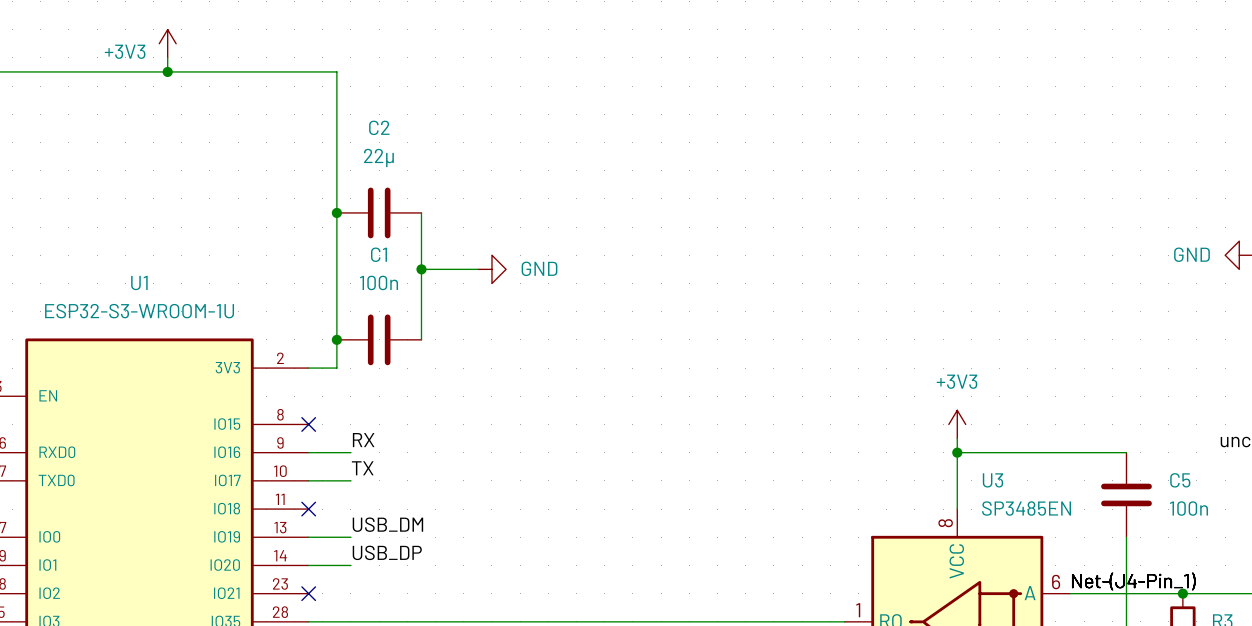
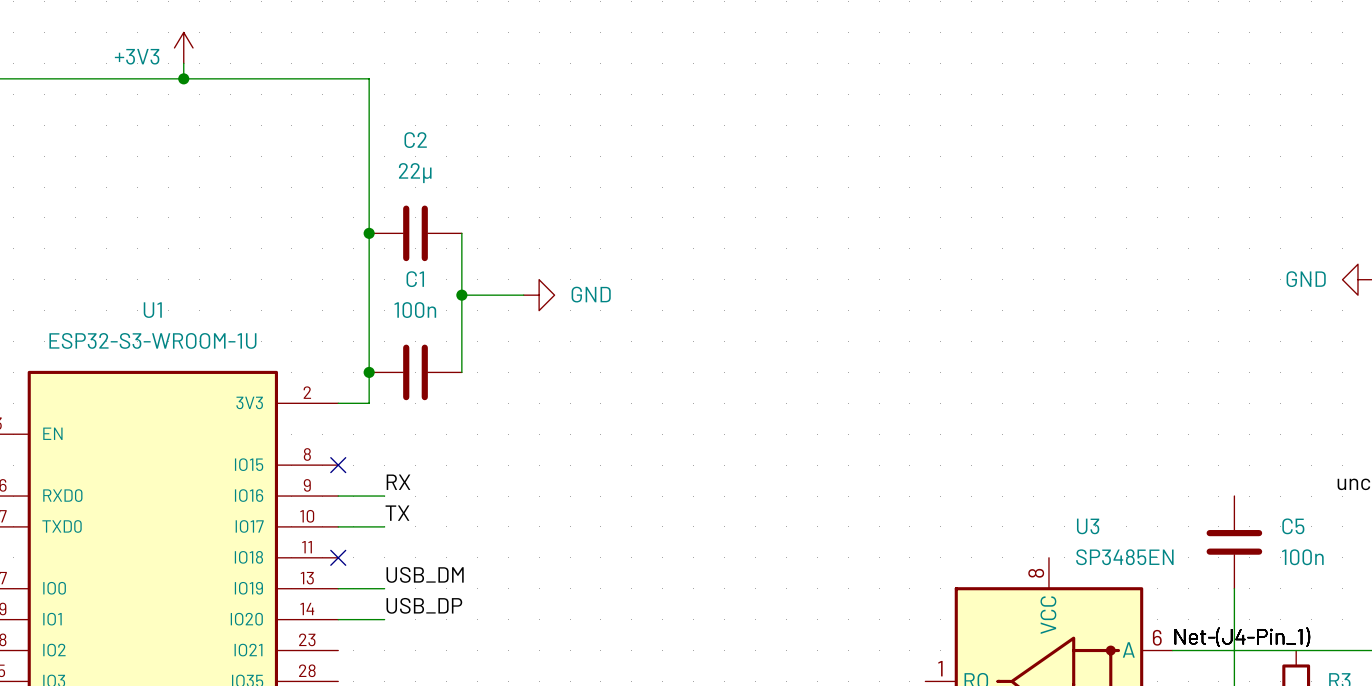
power symbol: +3V3 (957, 424) -> none
wire: (957, 438) (957, 509) -> none
wire: (957, 452) (1126, 452) -> none
junction: (957, 452) -> none
no-connect mark: (308, 593) -> none
junction: (1182, 593) -> none
wire: (308, 621) (844, 621) -> none

